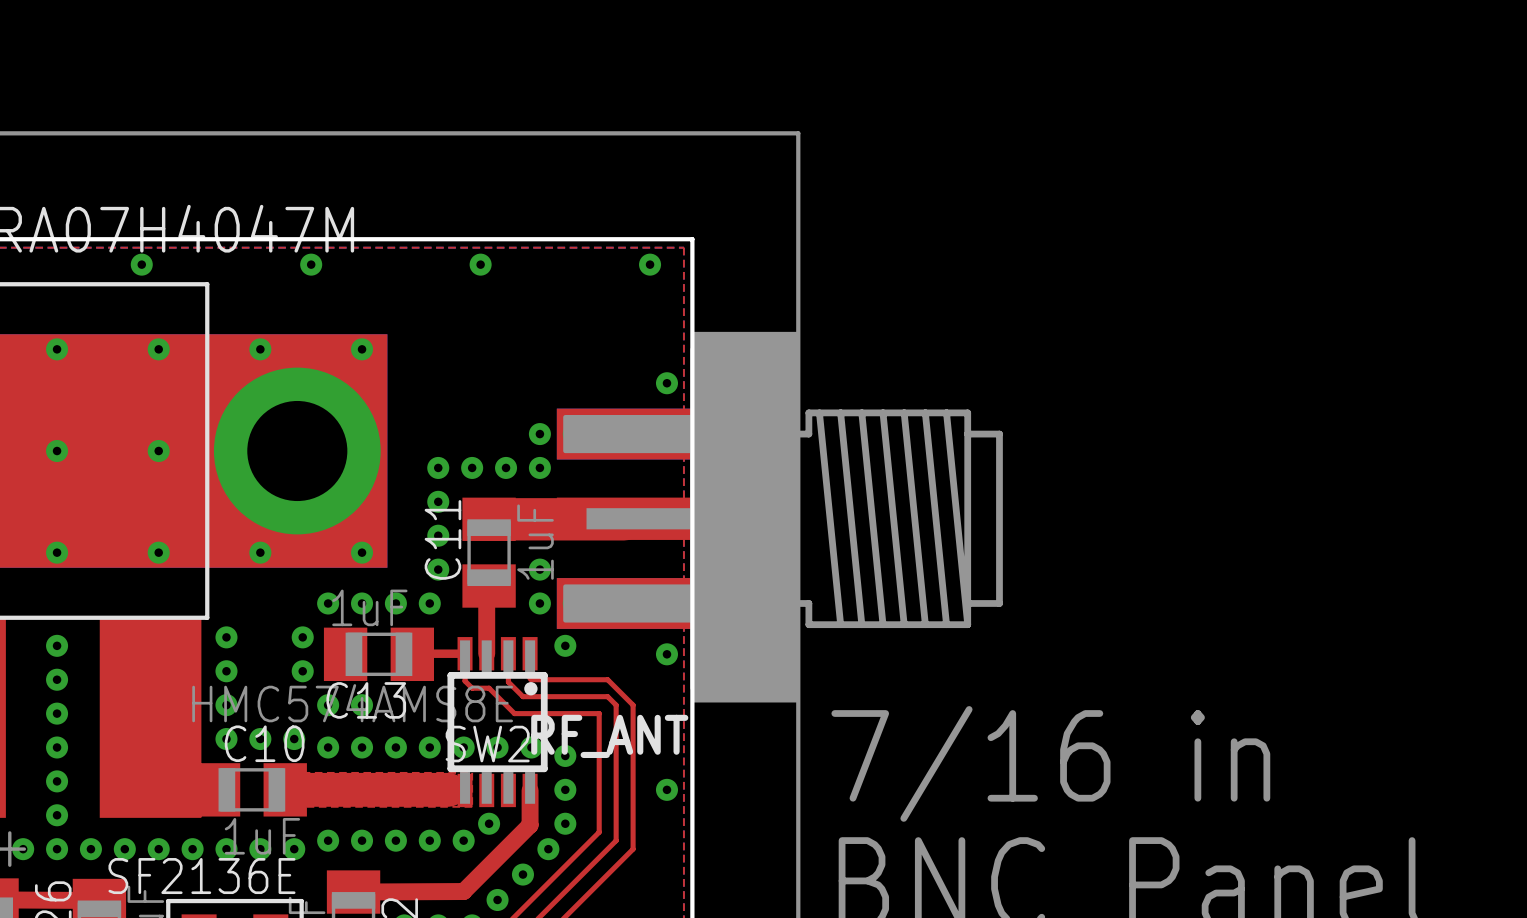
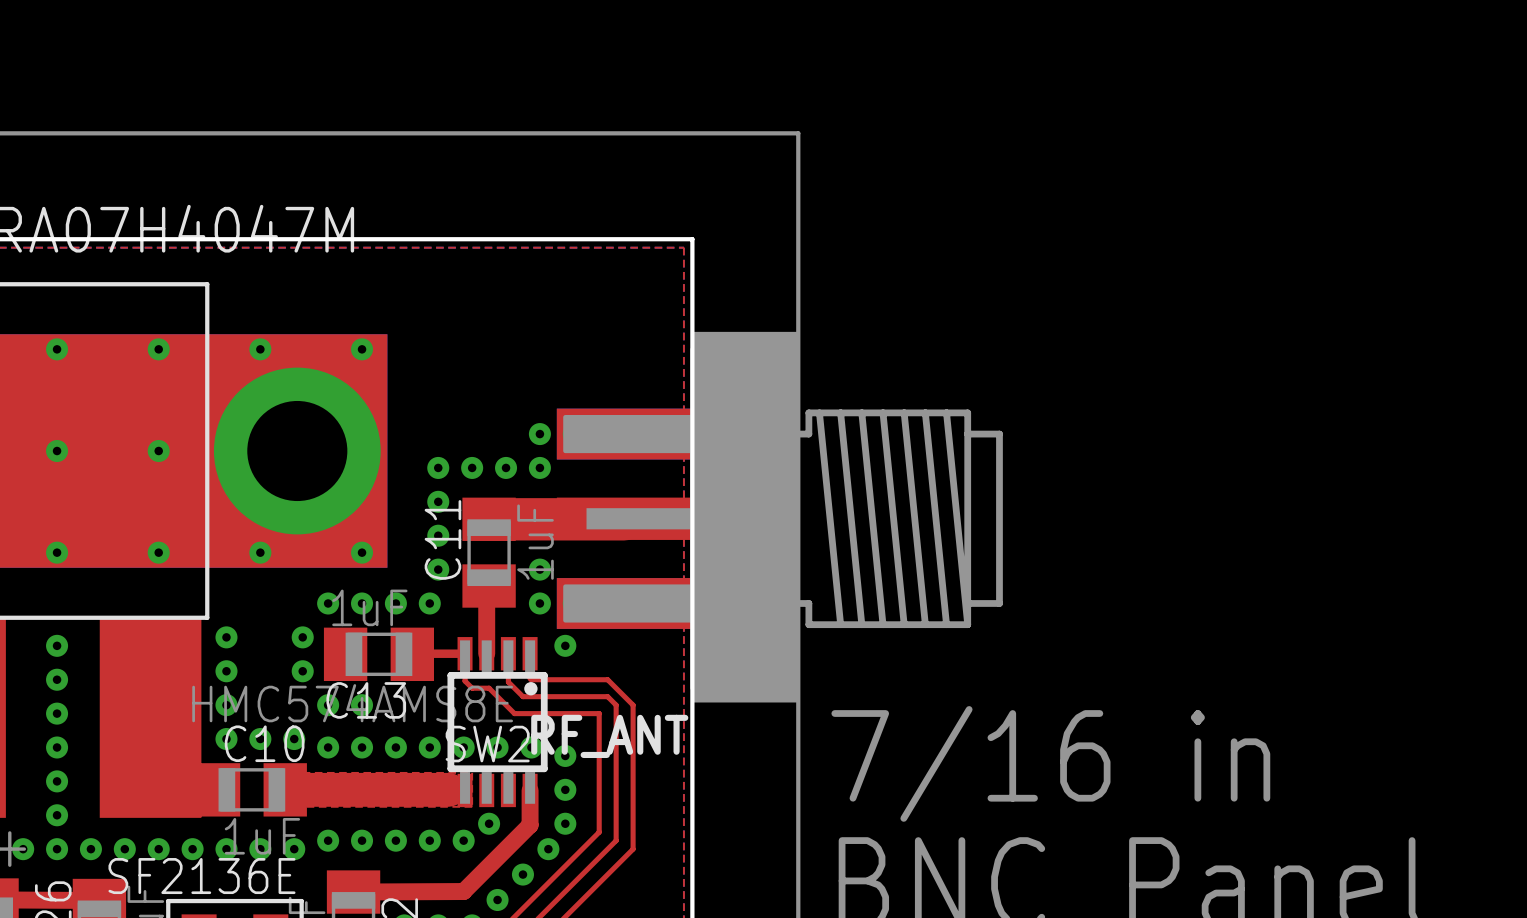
via: (141, 264) -> none
via: (311, 264) -> none
via: (480, 264) -> none
via: (650, 264) -> none
via: (666, 383) -> none
via: (666, 654) -> none
via: (666, 789) -> none

